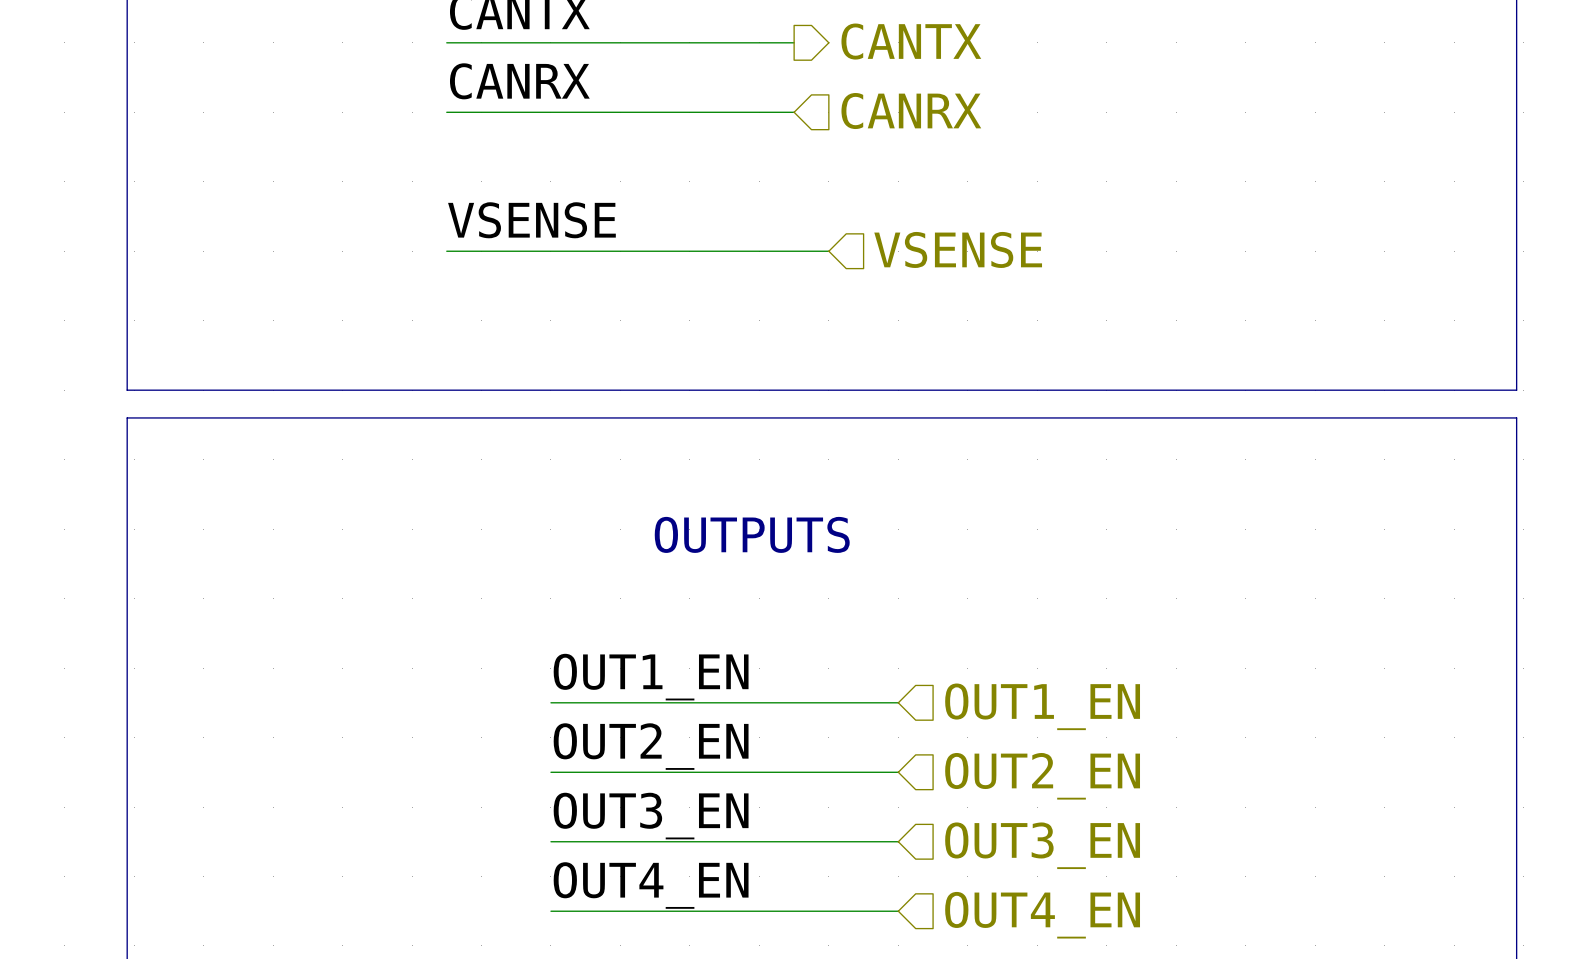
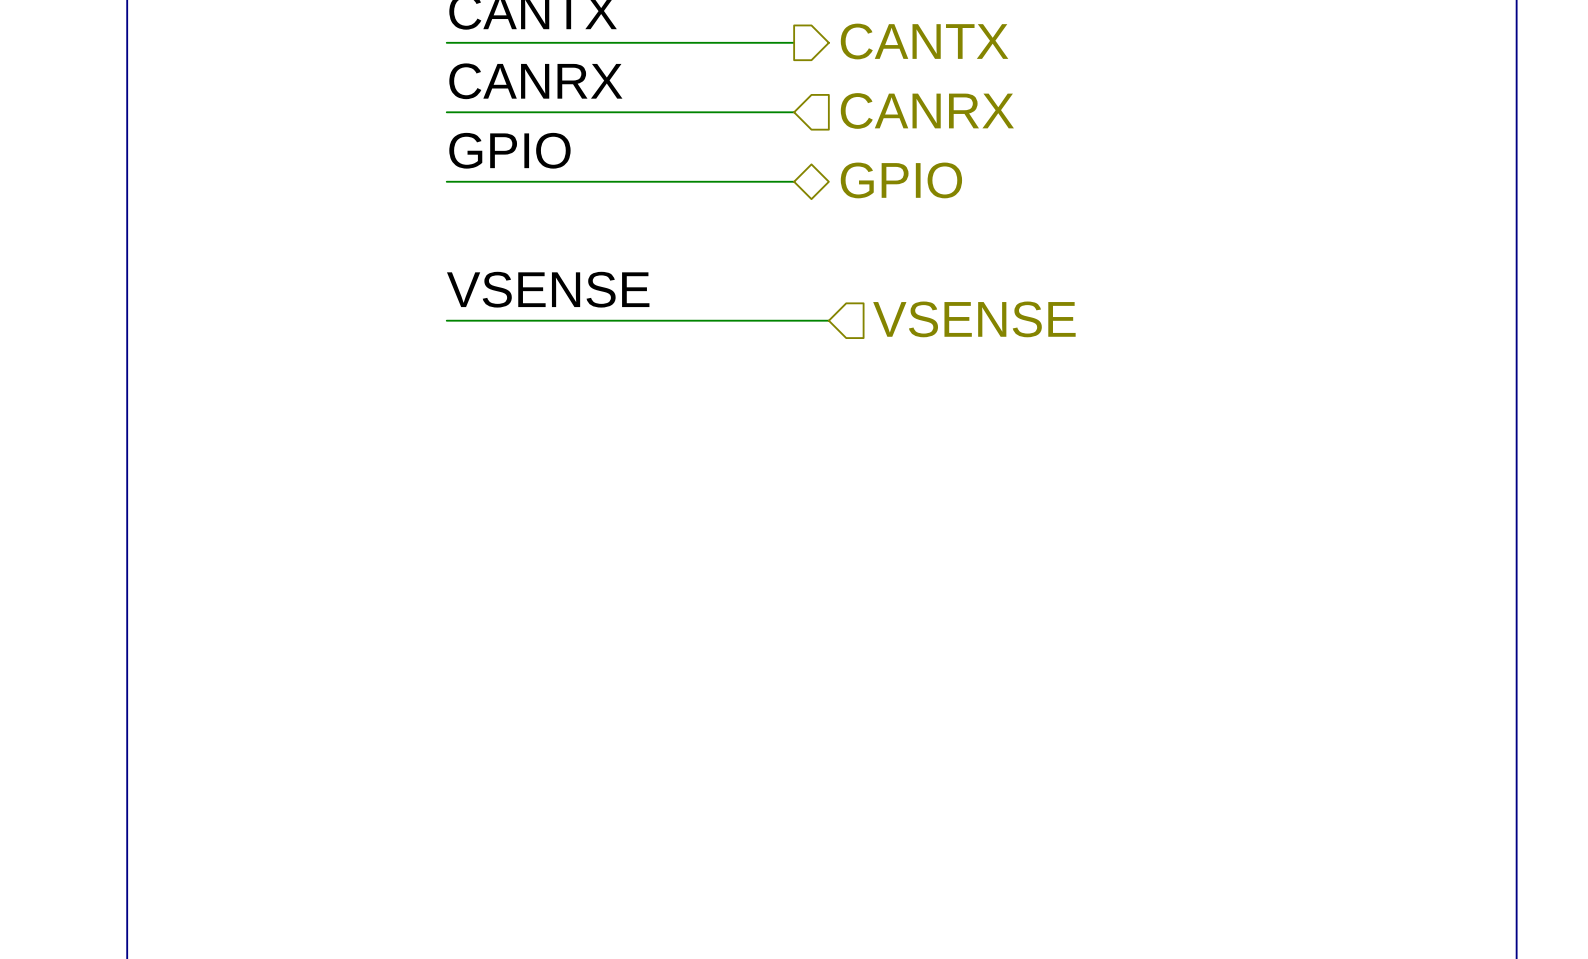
label: none -> GPIO (509, 150)
hierarchical label: none -> GPIO (901, 180)
label position: VSENSE (531, 220) -> VSENSE (548, 289)
hierarchical label position: VSENSE (958, 249) -> VSENSE (974, 319)
wire: (446, 251) (828, 251) -> (446, 320) (828, 320)
line: (127, 390) (1516, 390) -> (127, 390) (127, 417)
line: (127, 417) (1516, 417) -> (1516, 390) (1516, 417)
text: OUTPUTS (752, 534) -> none
label: OUT1_EN (651, 677) -> none
wire: (550, 702) (898, 702) -> (446, 181) (794, 181)
hierarchical label: OUT1_EN (1042, 706) -> none
label: OUT2_EN (651, 746) -> none
wire: (550, 772) (898, 772) -> none
hierarchical label: OUT2_EN (1042, 776) -> none
label: OUT3_EN (651, 816) -> none
wire: (550, 841) (898, 841) -> none
hierarchical label: OUT3_EN (1042, 845) -> none
label: OUT4_EN (651, 885) -> none
wire: (550, 911) (898, 911) -> none
hierarchical label: OUT4_EN (1042, 915) -> none

